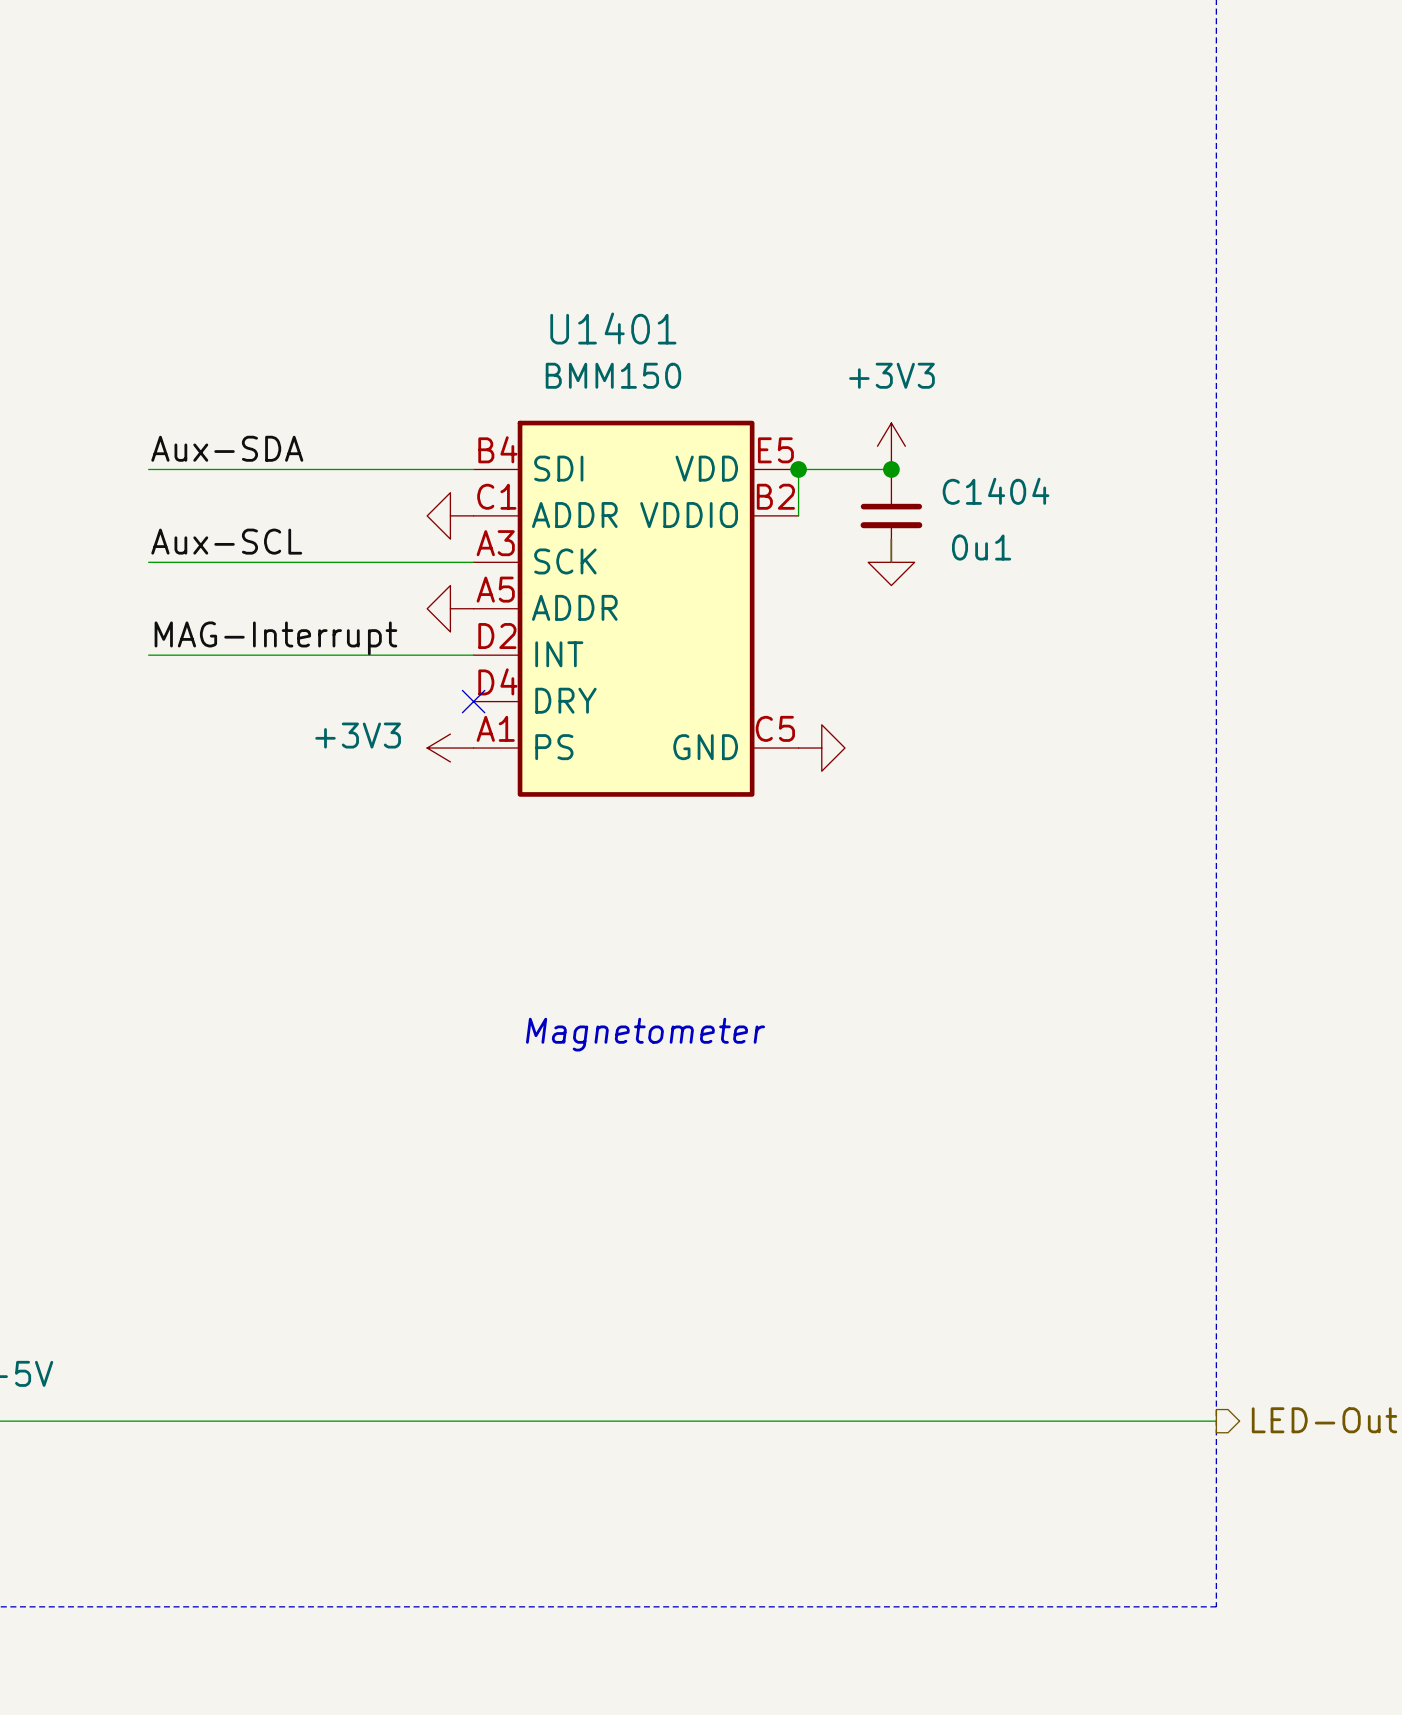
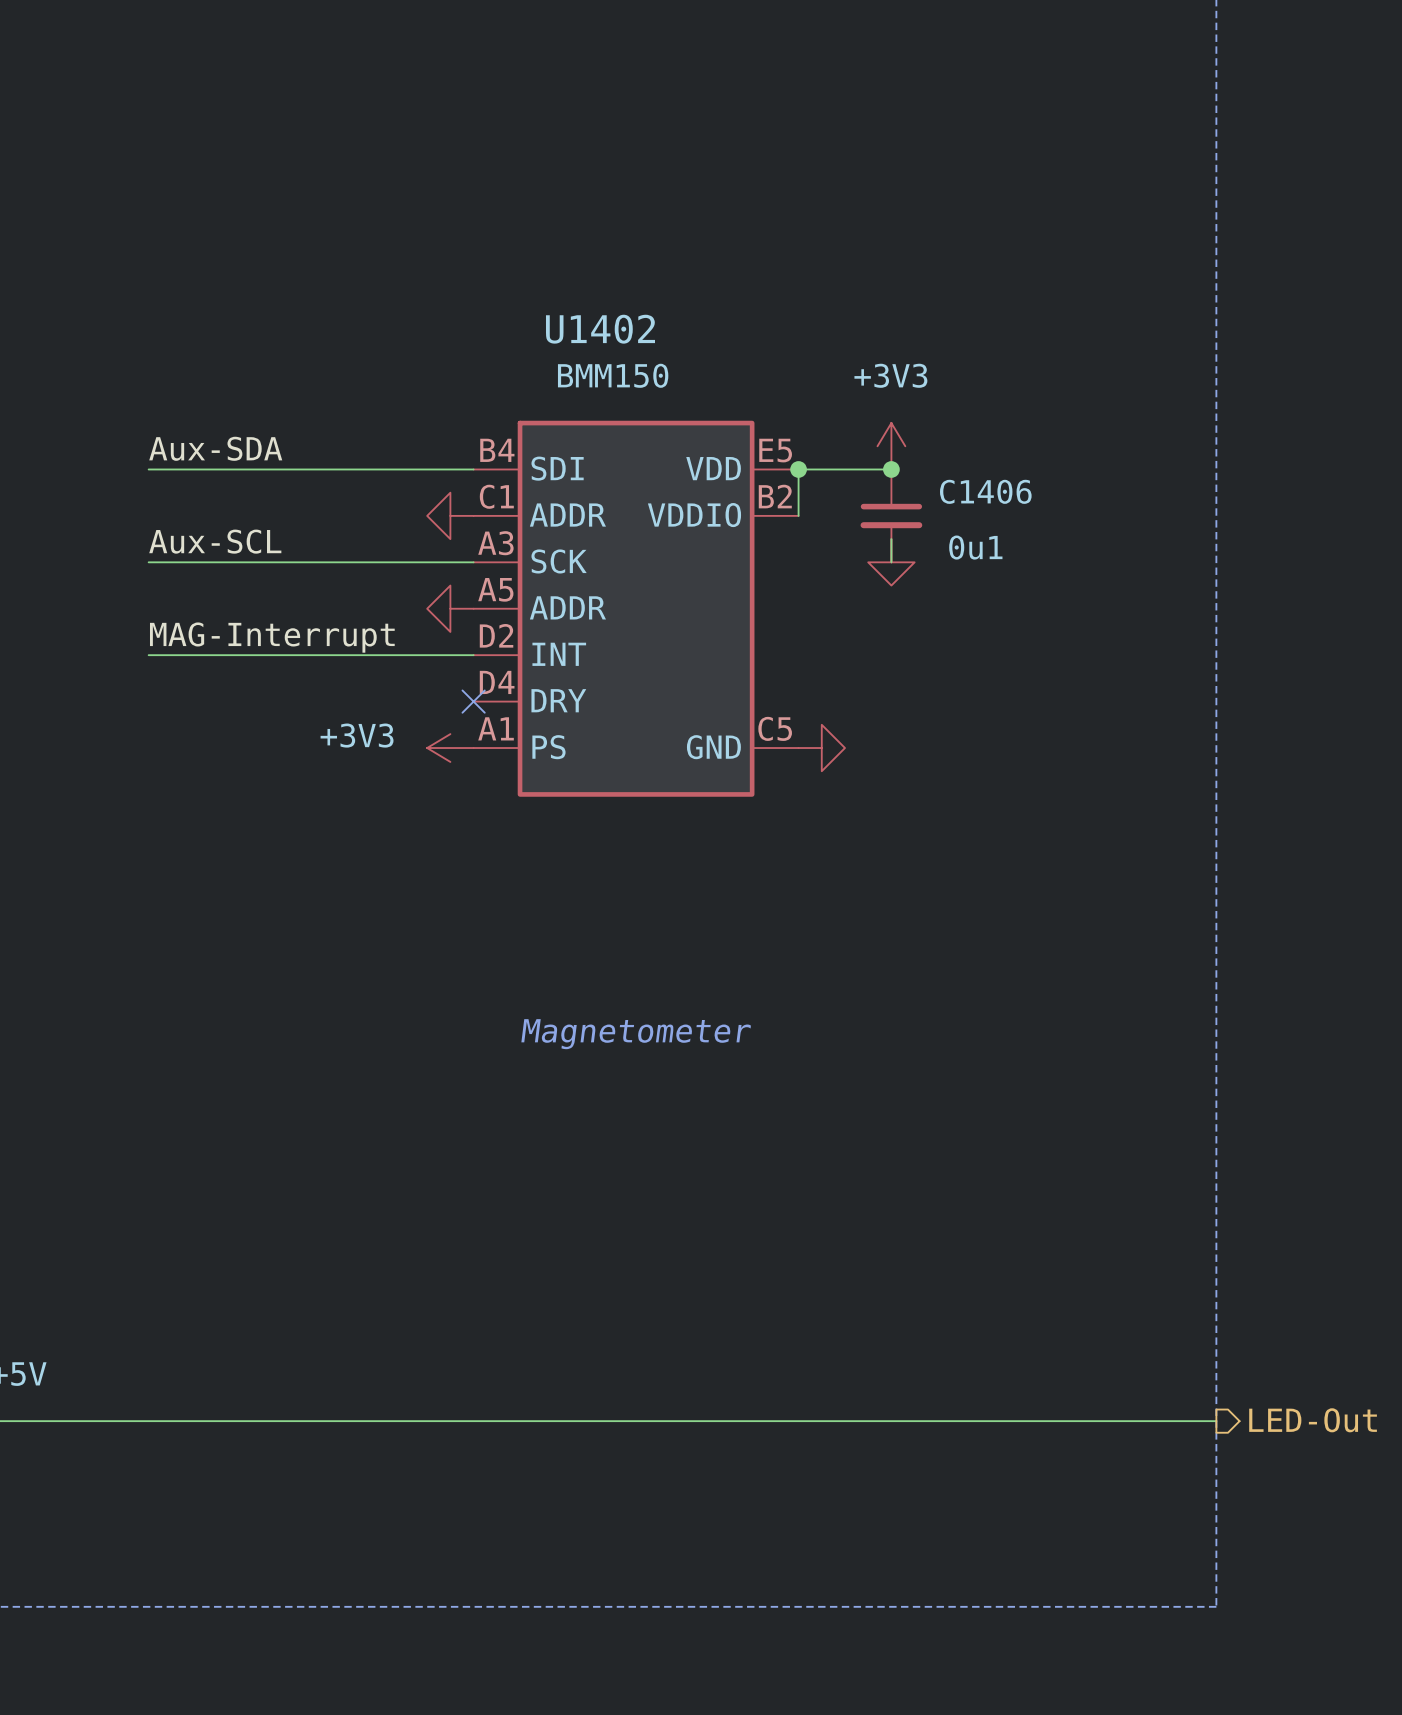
U1401 name: U1401 (613, 328) -> U1402 (600, 329)
C1404 name: C1404 (996, 491) -> C1406 (985, 491)

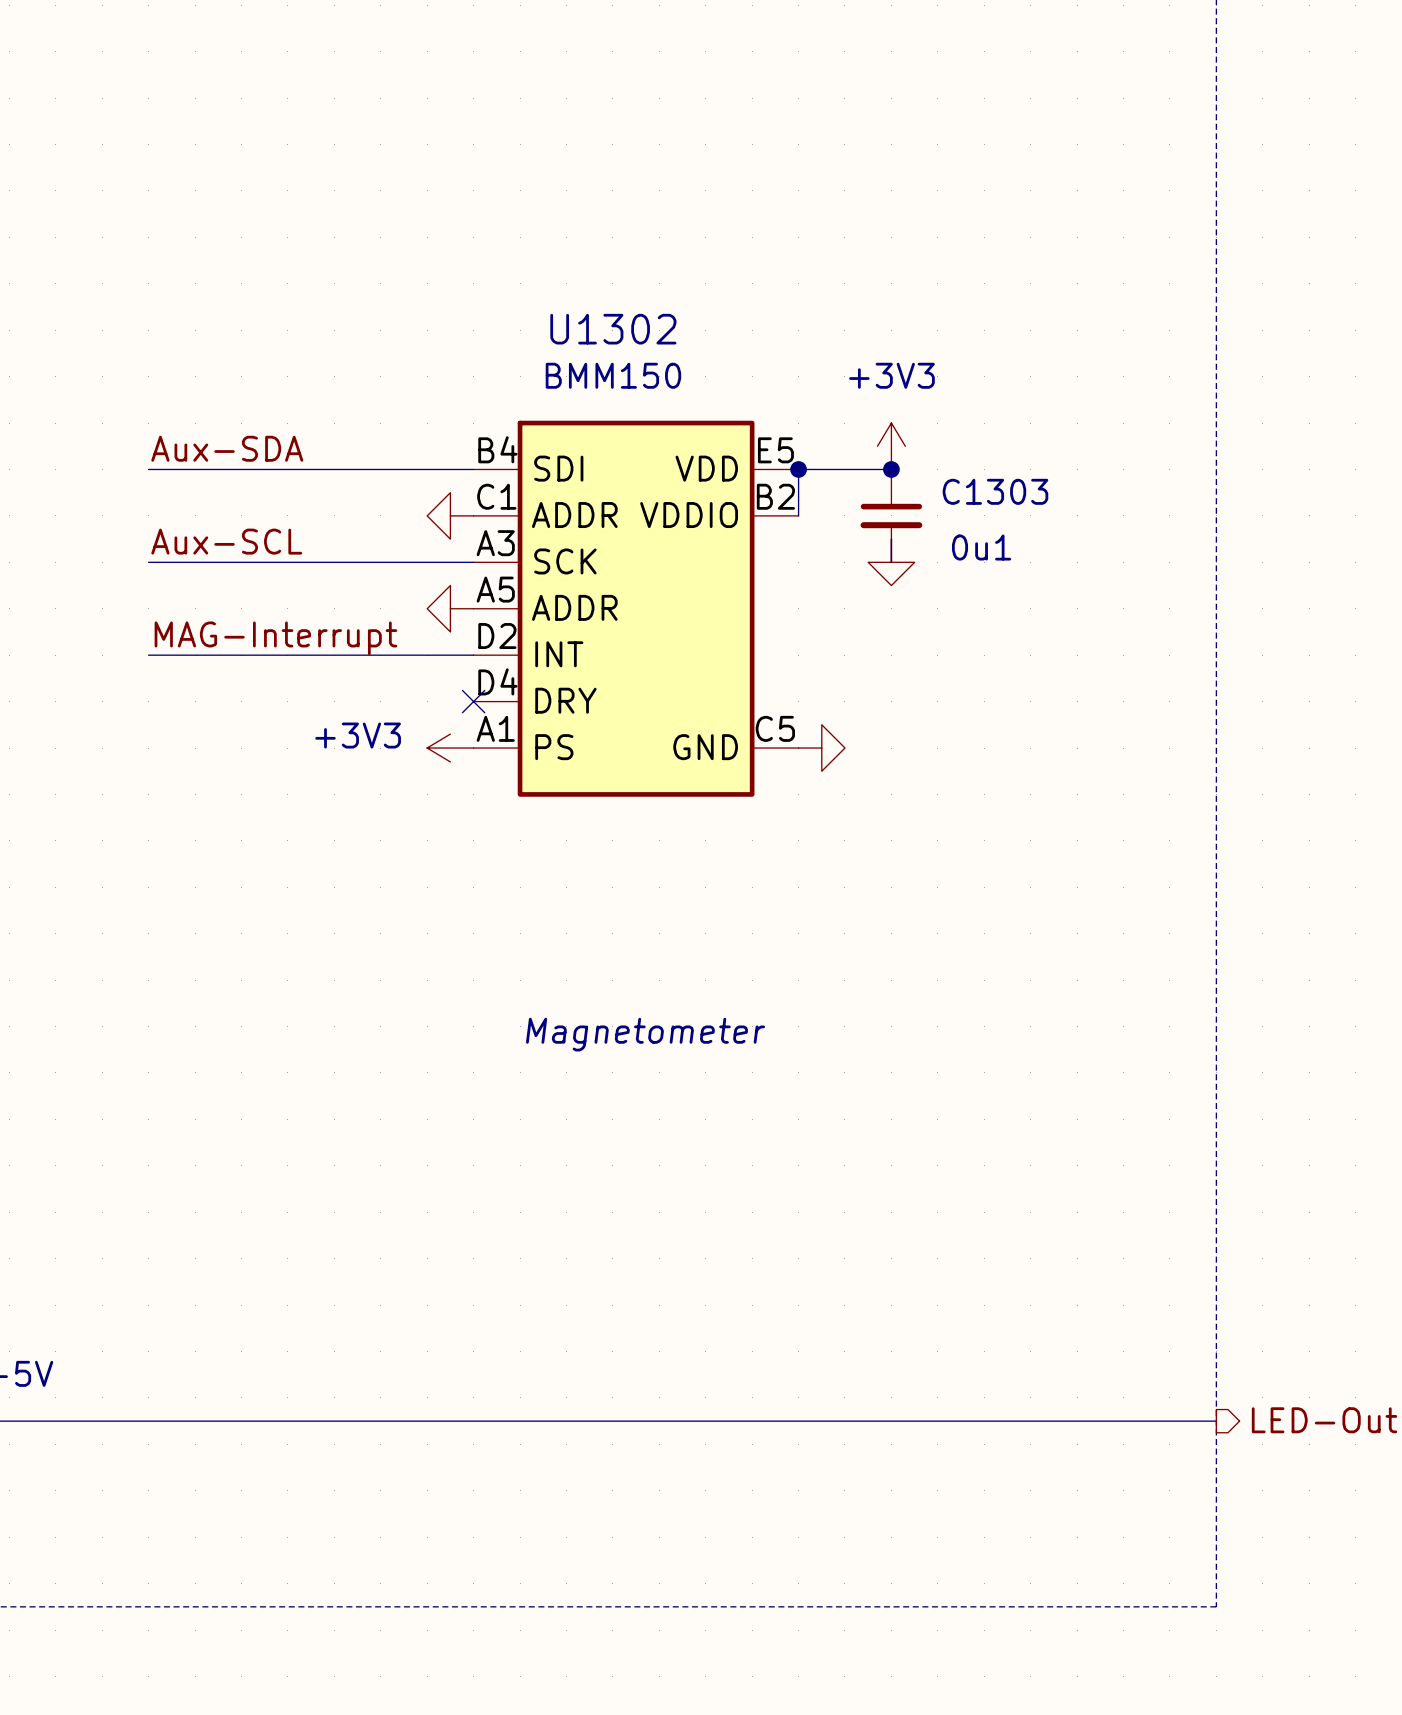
U1402 name: U1402 (600, 329) -> U1302 (613, 329)
C1406 name: C1406 (985, 491) -> C1303 (995, 491)

